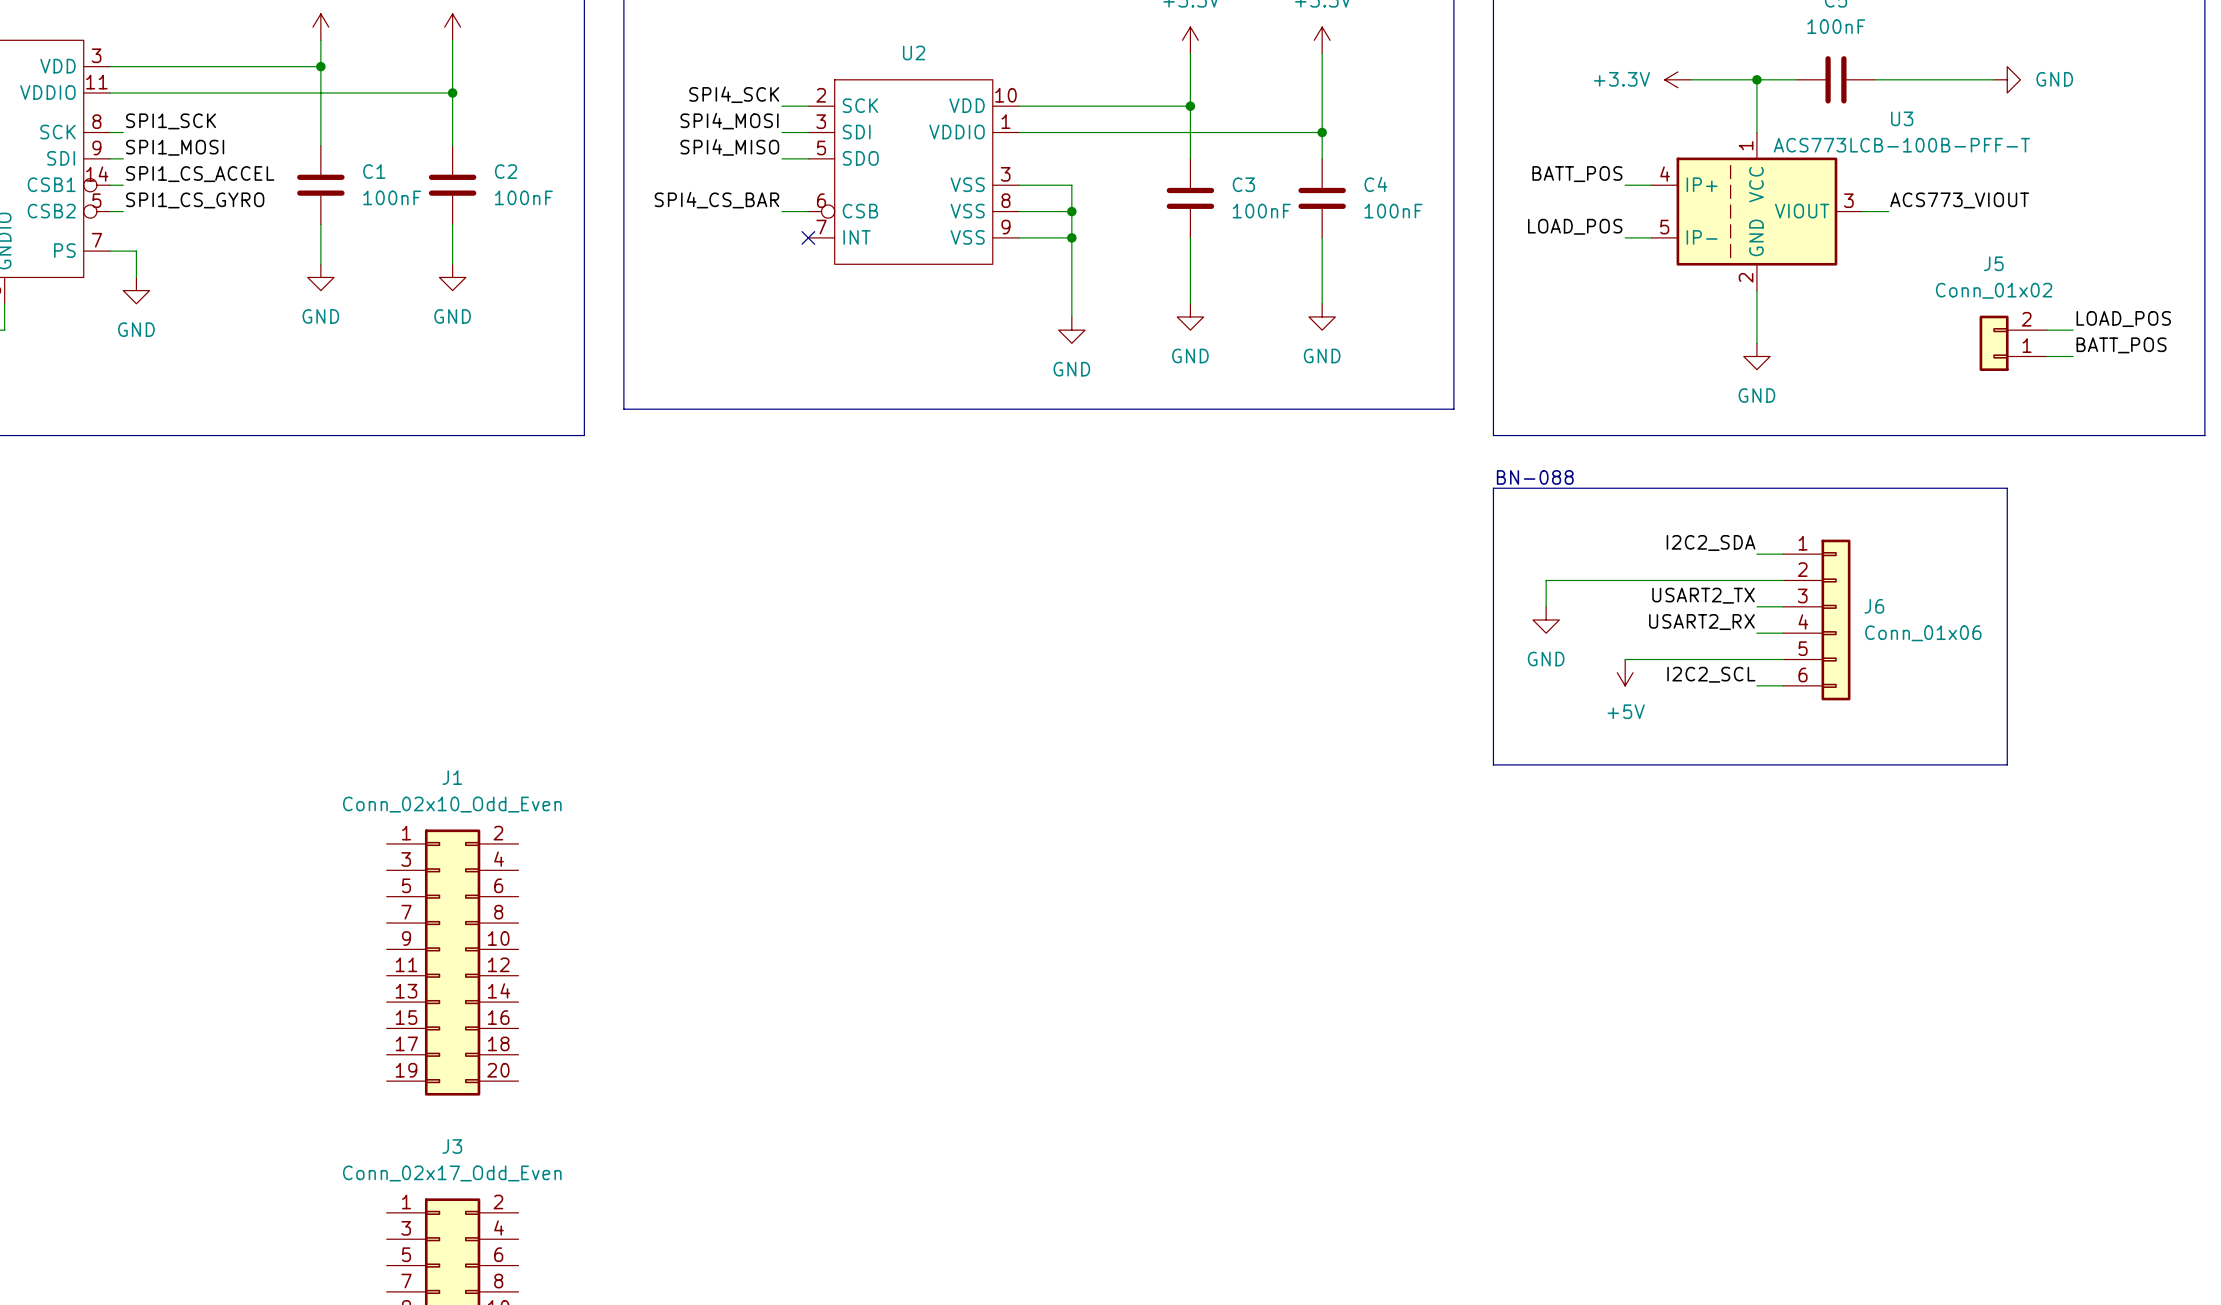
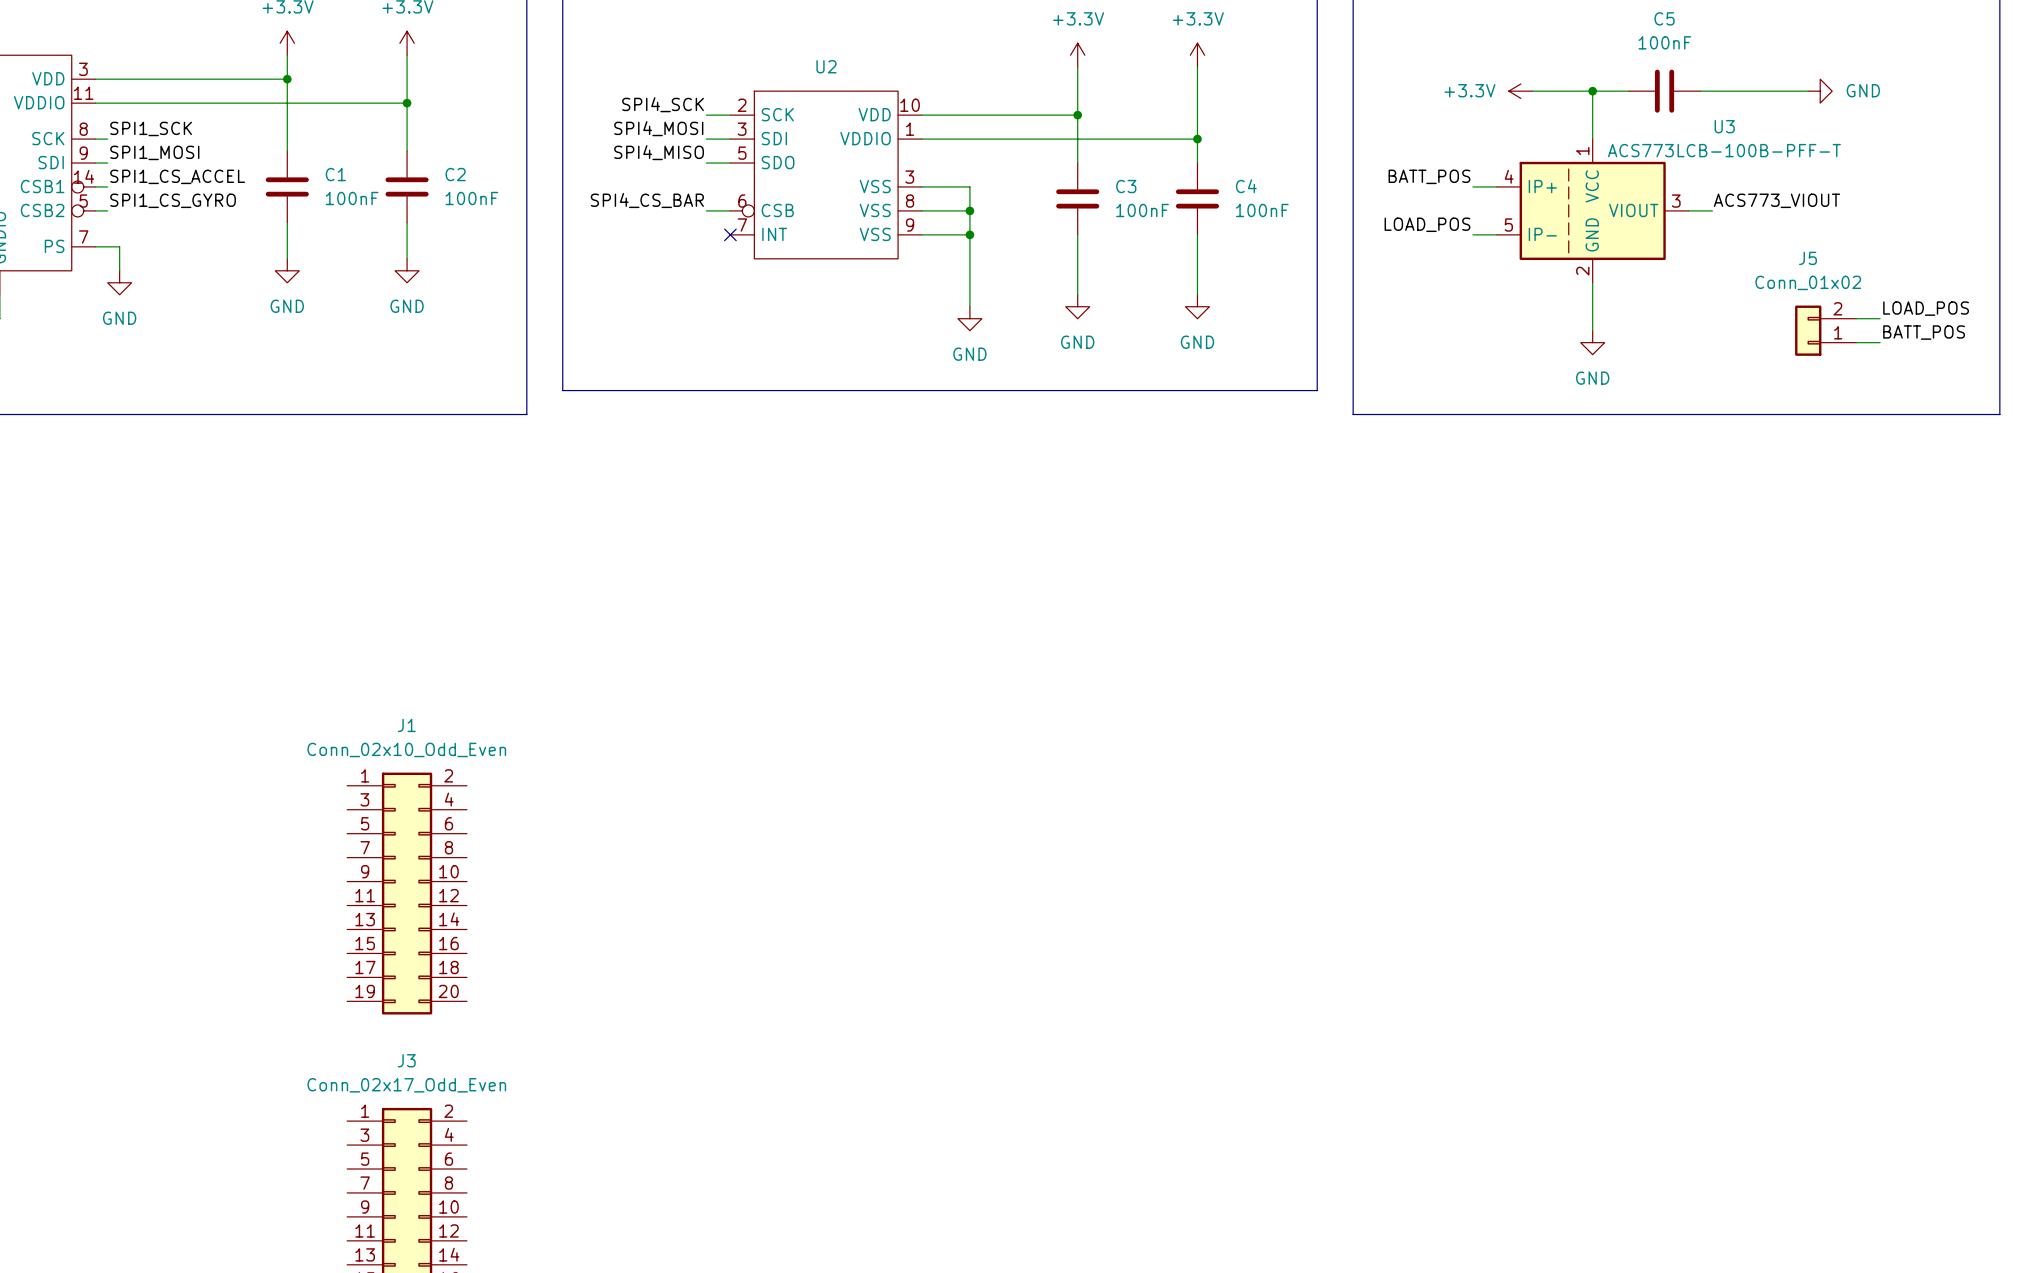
text: BN-088 (1535, 477) -> none
line: (1493, 488) (2007, 488) (2007, 764) (1493, 764) (1493, 488) -> none
label: I2C2_SDA (1711, 542) -> none
wire: (1756, 554) (1783, 554) -> none
wire: (1783, 580) (1546, 580) (1546, 606) -> none
label: USART2_TX (1703, 595) -> none
wire: (1756, 606) (1783, 606) -> none
power symbol: GND (1546, 619) -> none
J6: Conn_01x06 (1816, 619) -> none
label: USART2_RX (1701, 622) -> none
wire: (1756, 633) (1783, 633) -> none
wire: (1625, 659) (1783, 659) -> none
power symbol: +5V (1625, 672) -> none
label: I2C2_SCL (1711, 674) -> none
wire: (1756, 685) (1783, 685) -> none

